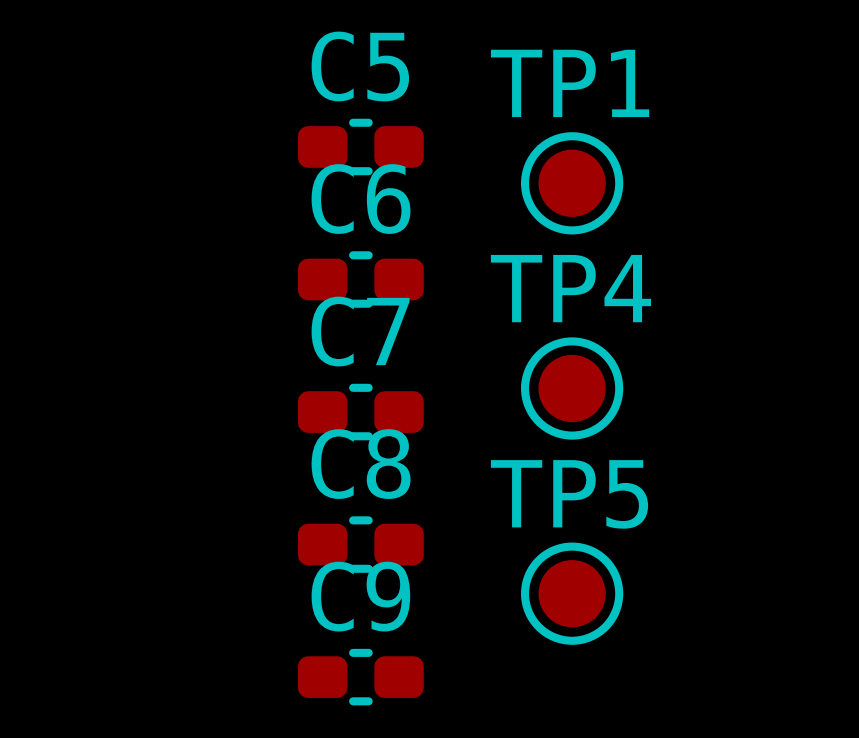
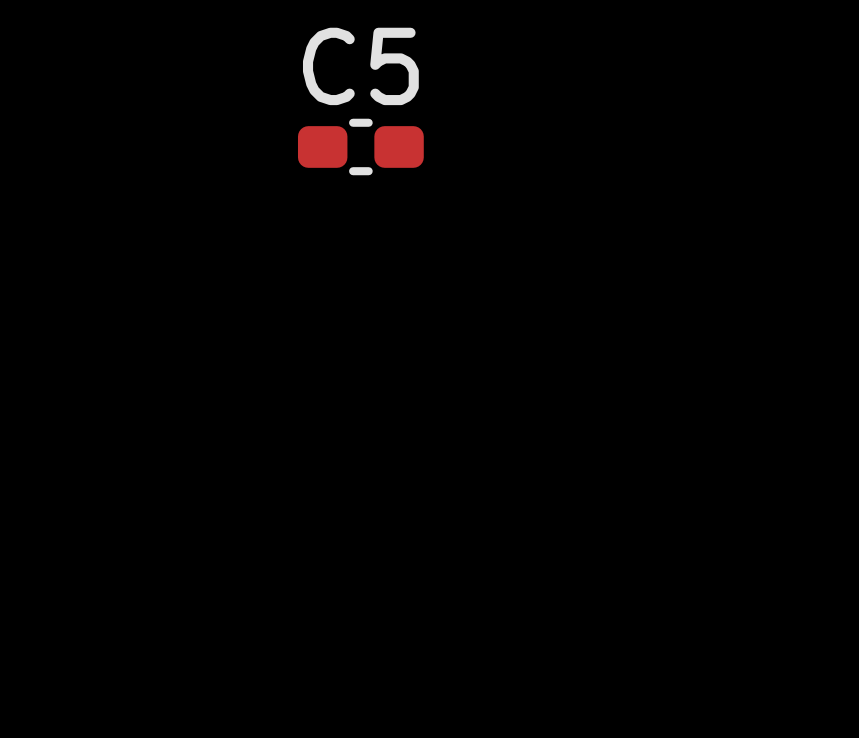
TP1: (572, 183) -> none
C6: (360, 279) -> none
TP4: (572, 388) -> none
C7: (360, 412) -> none
C8: (360, 544) -> none
TP5: (572, 593) -> none
C9: (360, 677) -> none

